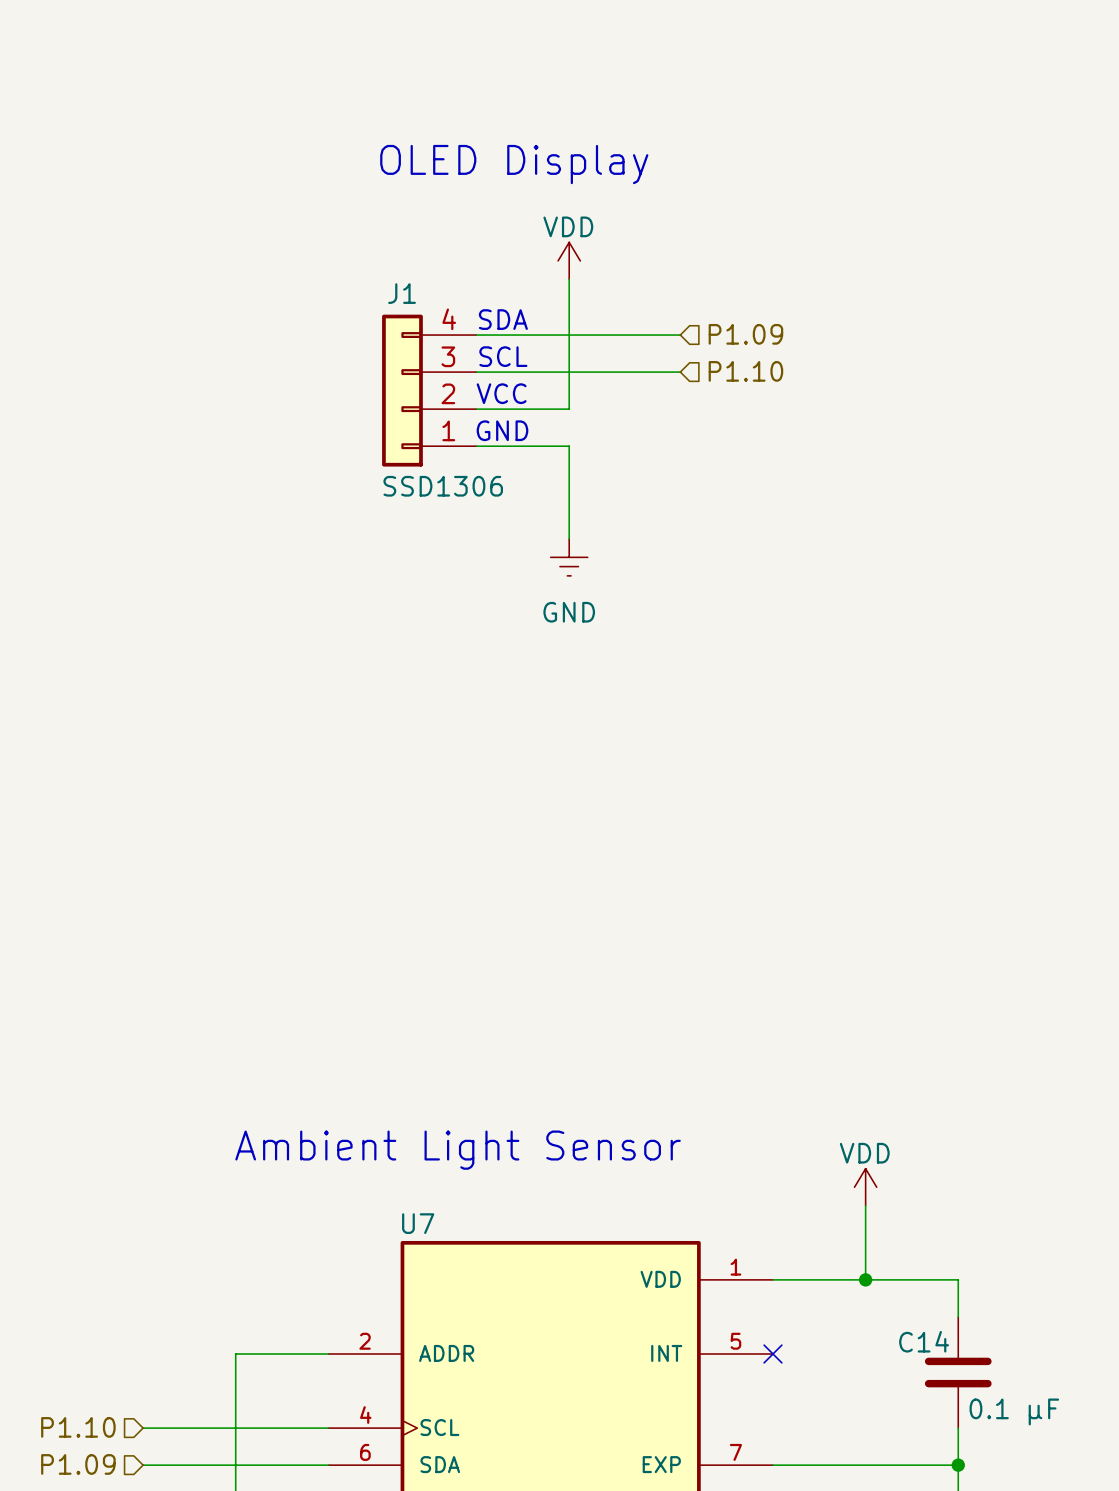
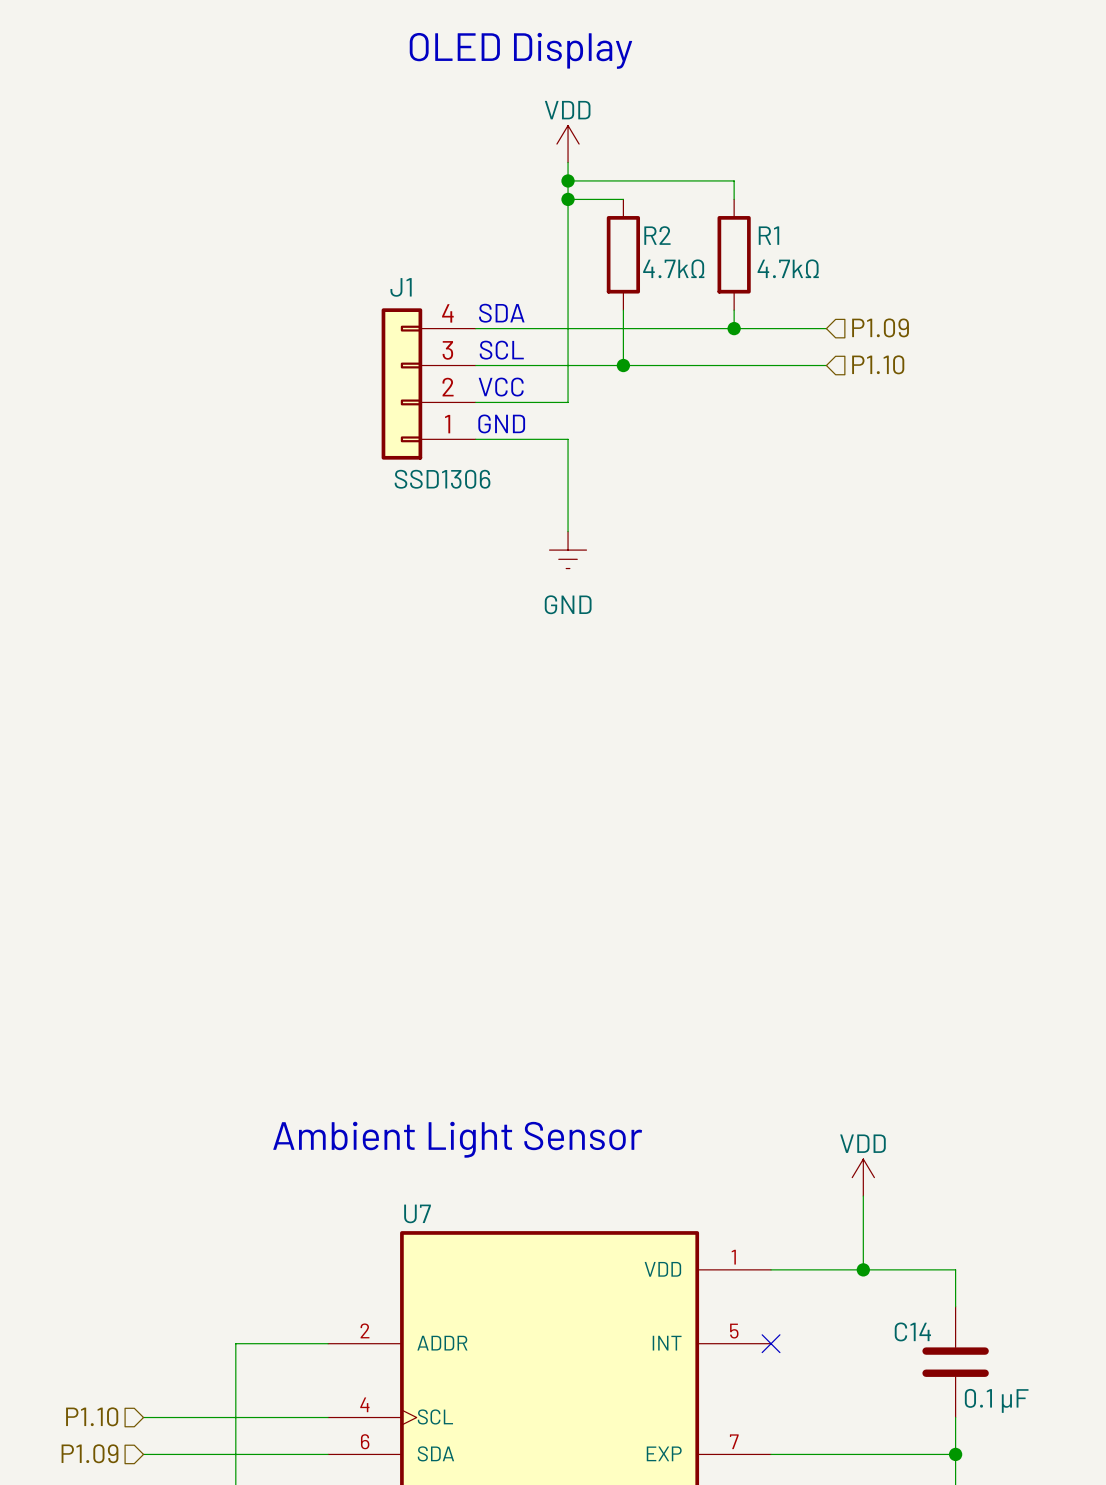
text position: OLED Display (514, 164) -> OLED Display (521, 50)
wire: none -> (568, 162) (568, 273)
wire: none -> (568, 180) (734, 180) (734, 199)
junction: none -> (568, 180)
wire: none -> (568, 199) (623, 199)
junction: none -> (568, 199)
power symbol position: VDD (569, 260) -> VDD (568, 144)
R2: none -> 4.7kΩ (623, 254)
R1: none -> 4.7kΩ (734, 254)
wire: none -> (623, 310) (623, 365)
wire: none -> (734, 310) (734, 328)
hierarchical label position: P1.09 (745, 334) -> P1.09 (880, 327)
wire: none -> (678, 328) (826, 328)
junction: none -> (734, 328)
hierarchical label position: P1.10 (745, 371) -> P1.10 (878, 364)
junction: none -> (623, 365)
wire: none -> (678, 365) (826, 365)

